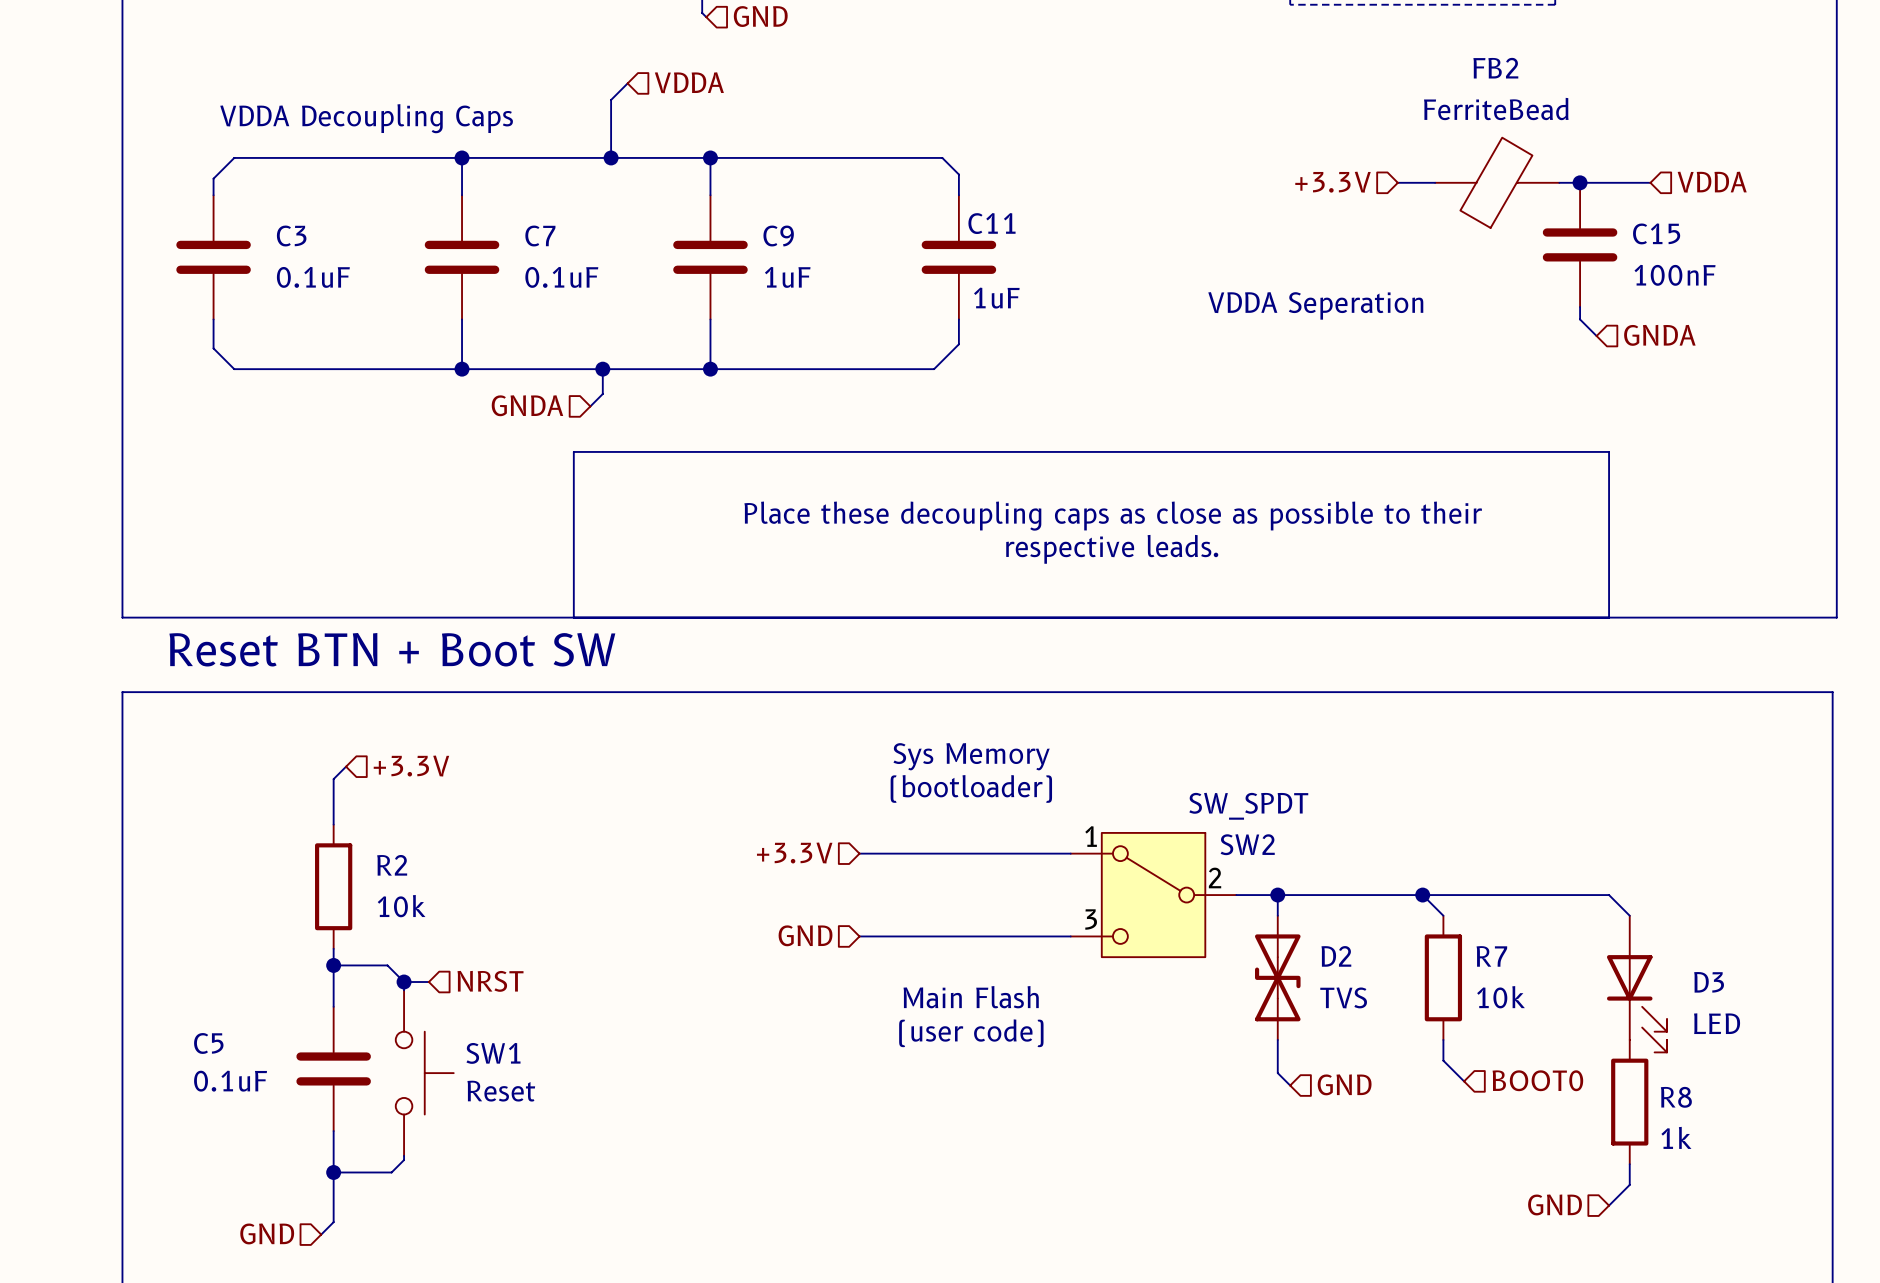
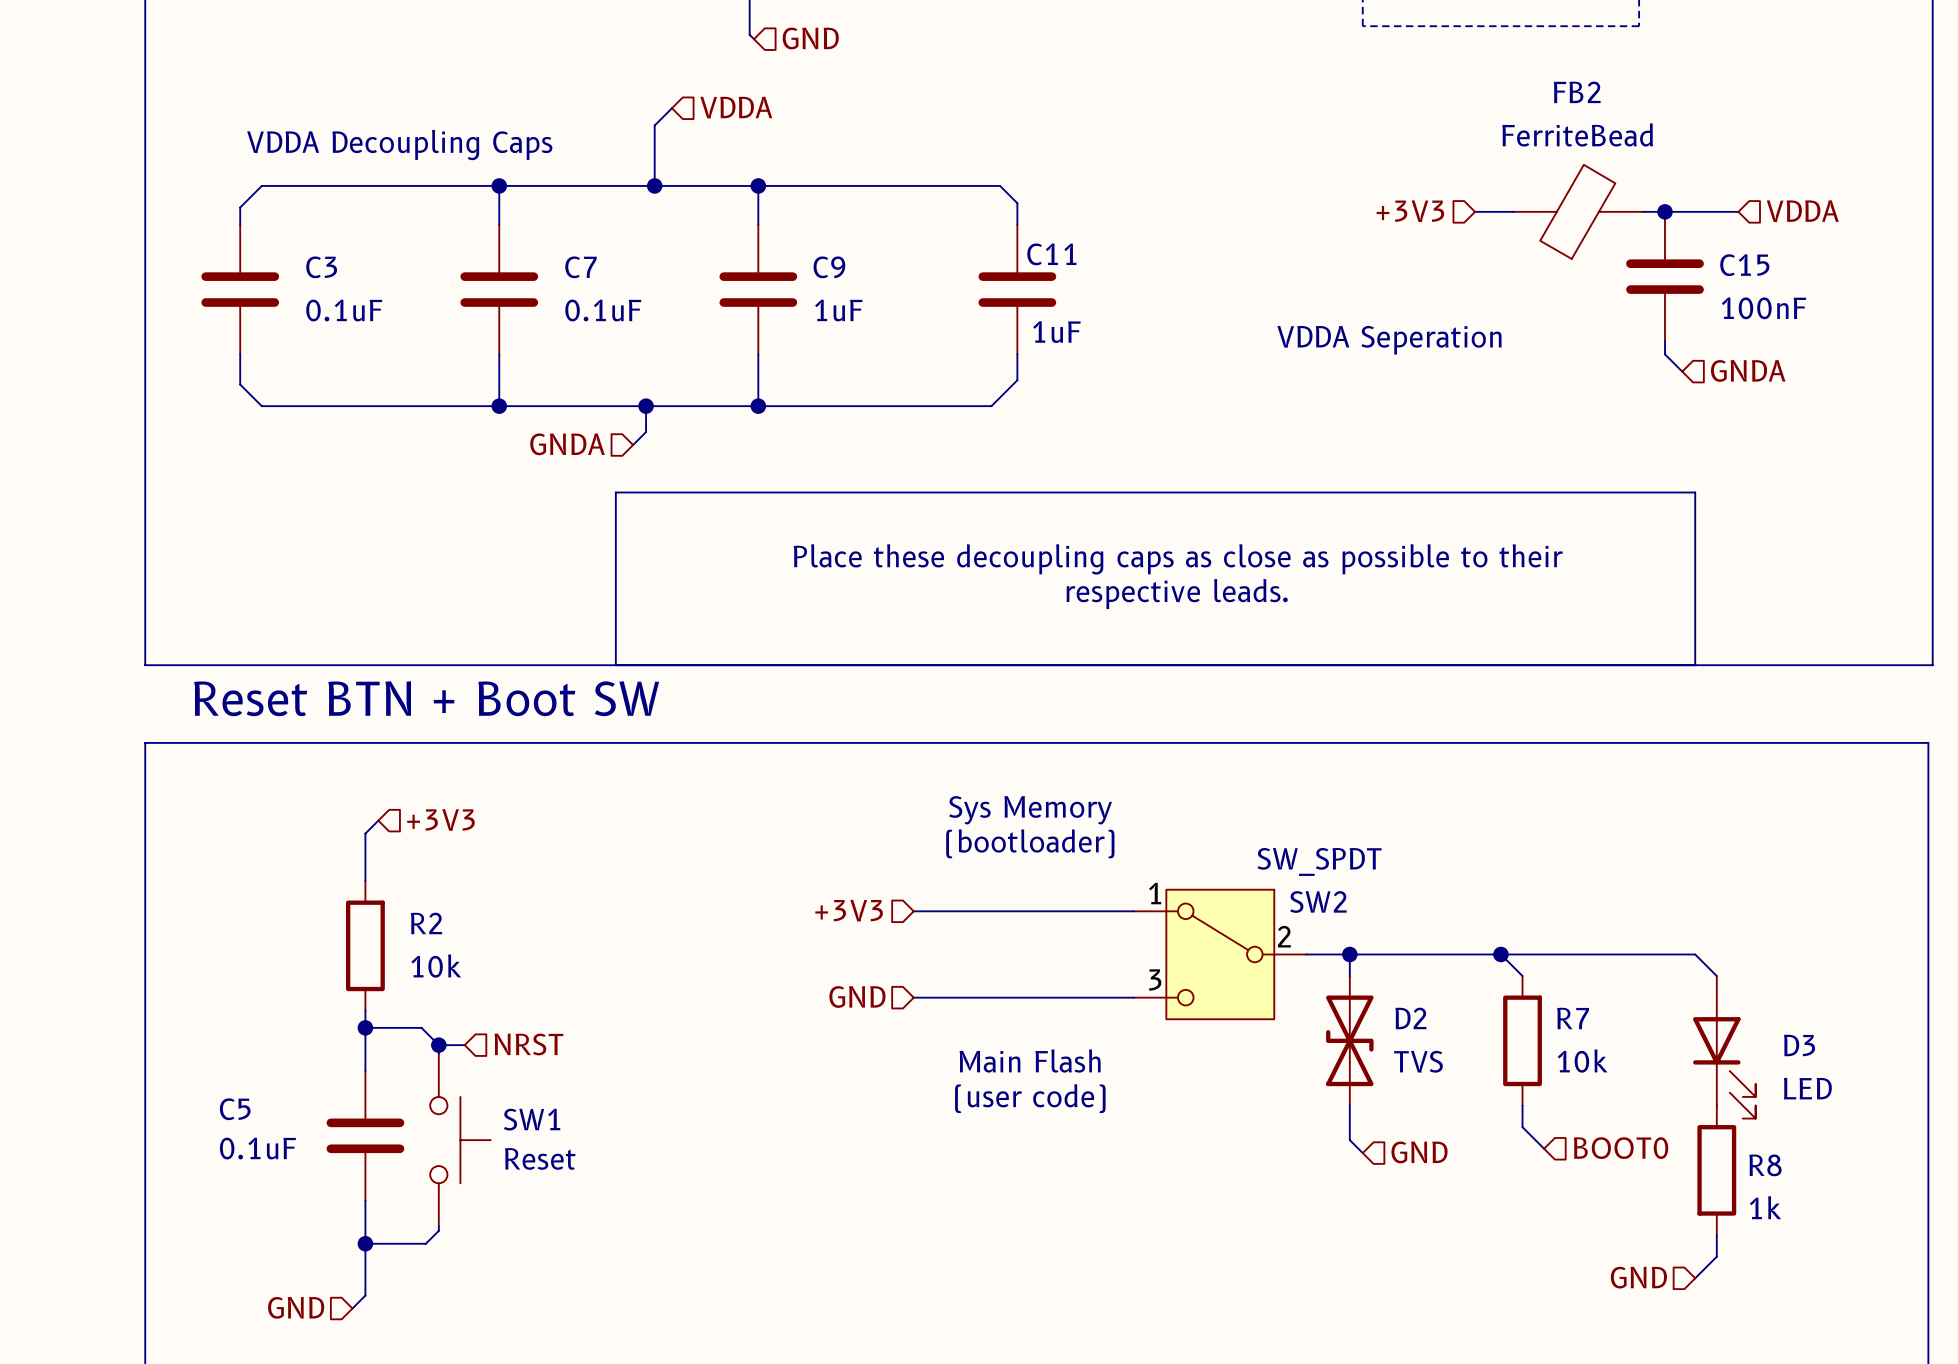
hierarchical label: +3.3V (1333, 182) -> +3V3 (1410, 211)
hierarchical label: +3.3V (411, 766) -> +3V3 (441, 819)
hierarchical label: +3.3V (794, 853) -> +3V3 (849, 910)

